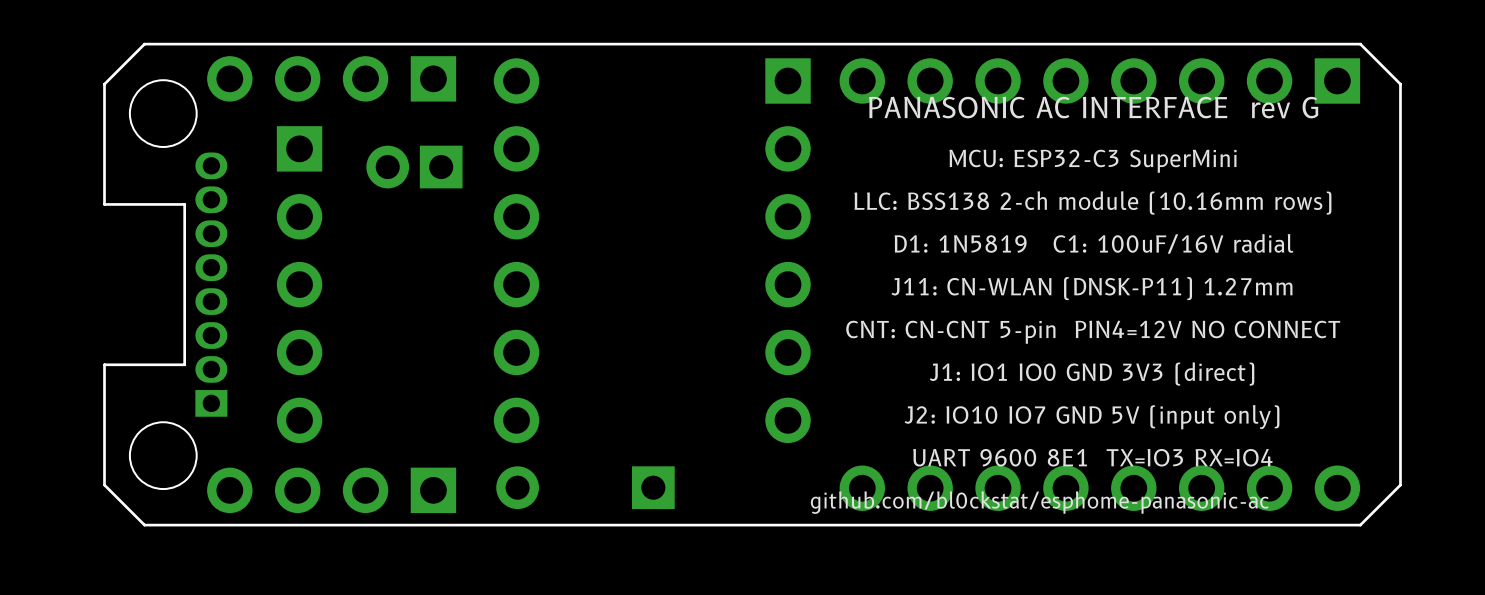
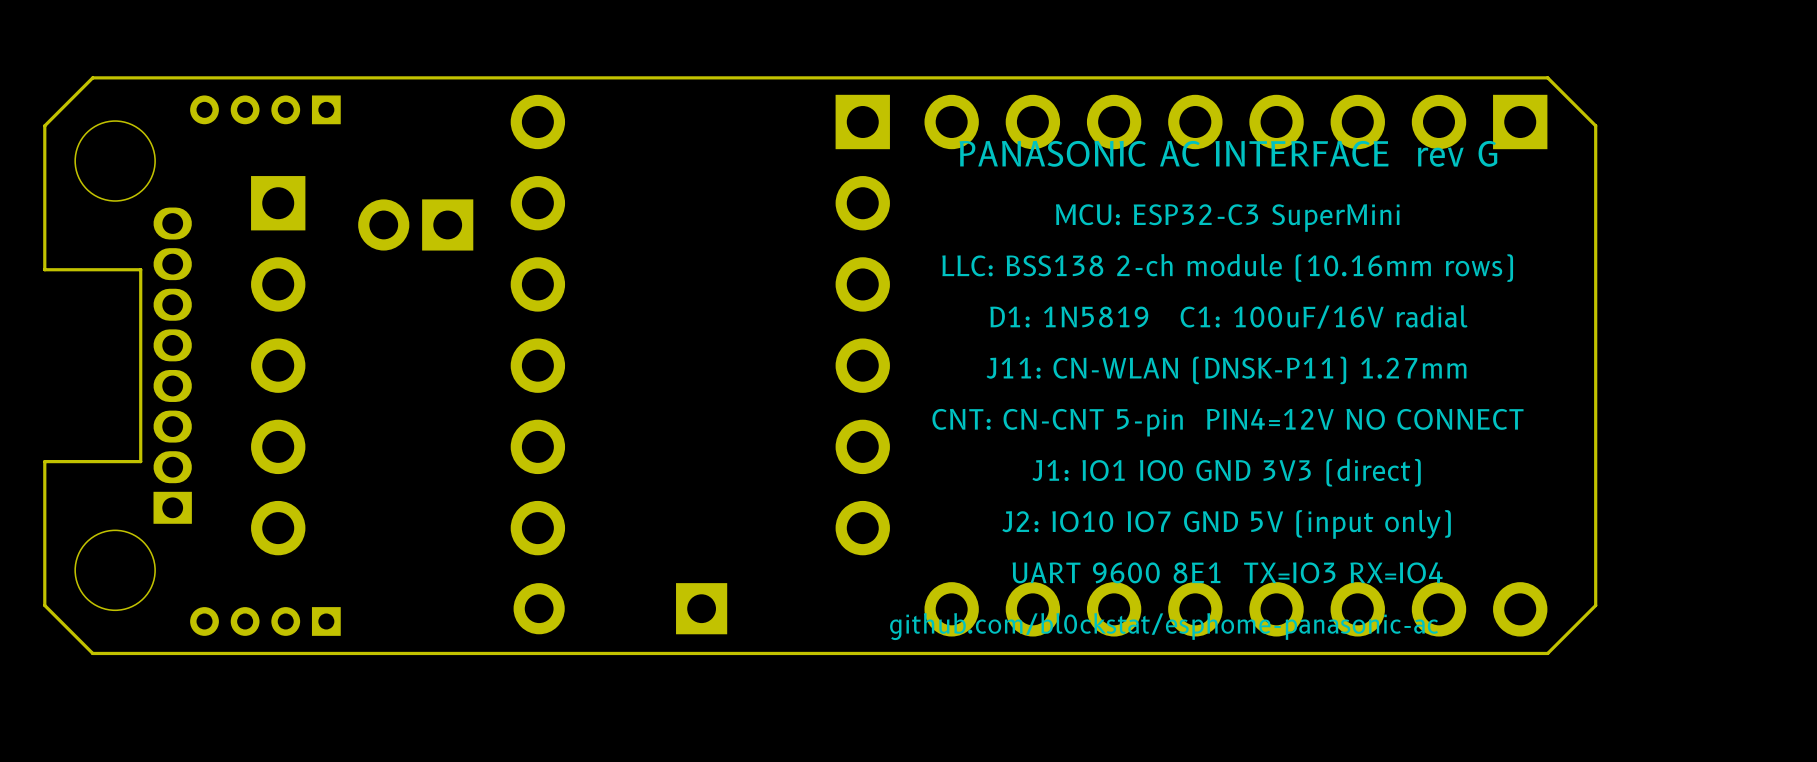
part: none -> (265, 109)
part: (331, 78) -> none
part: (331, 490) -> none
part: none -> (265, 621)

